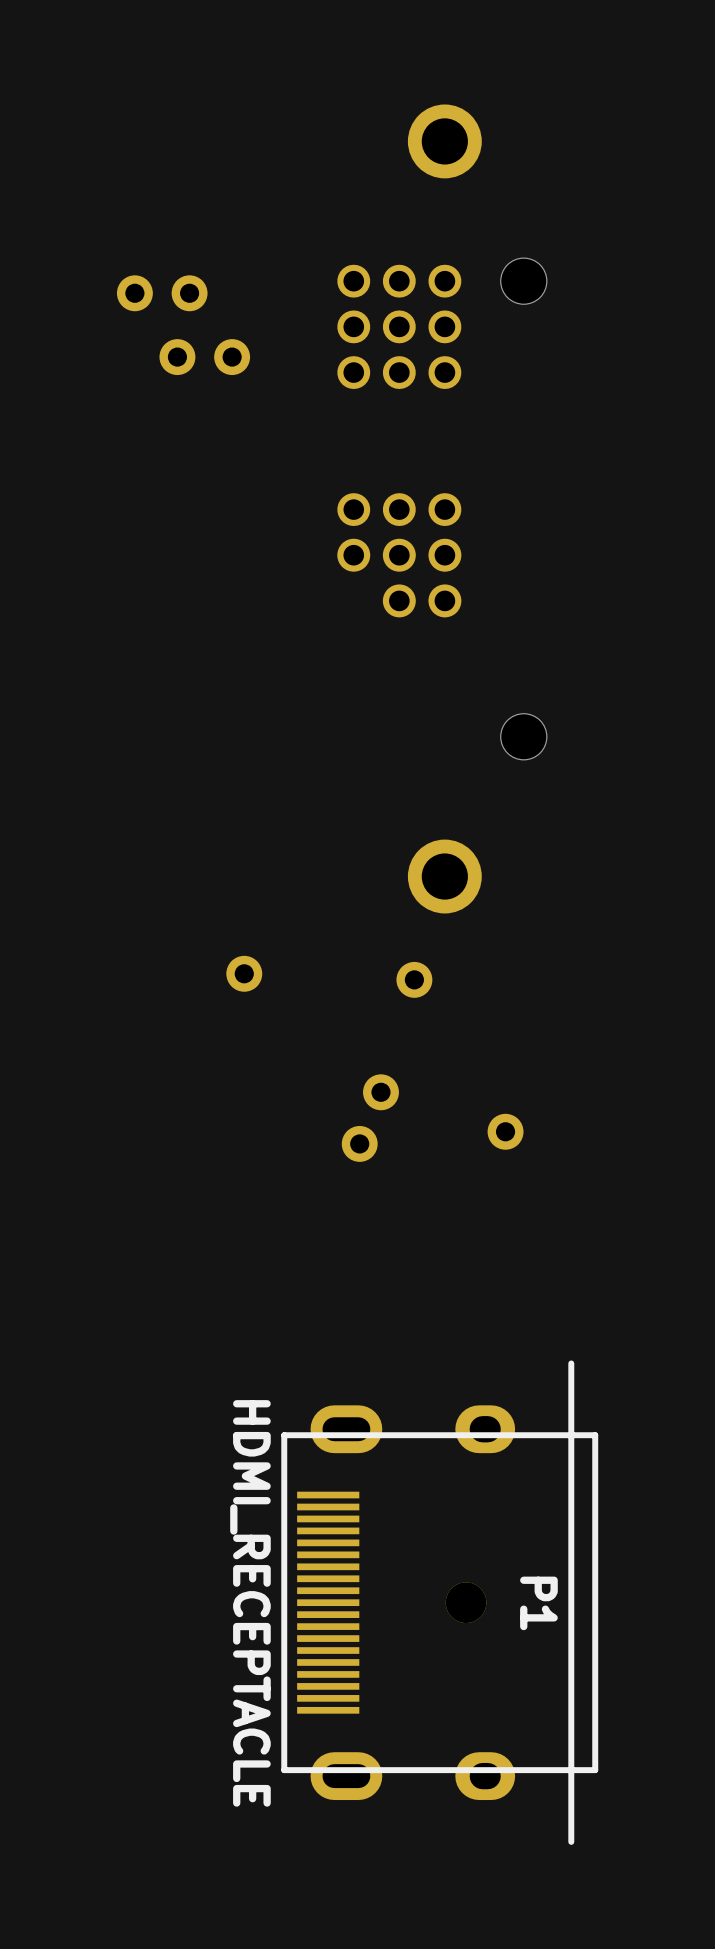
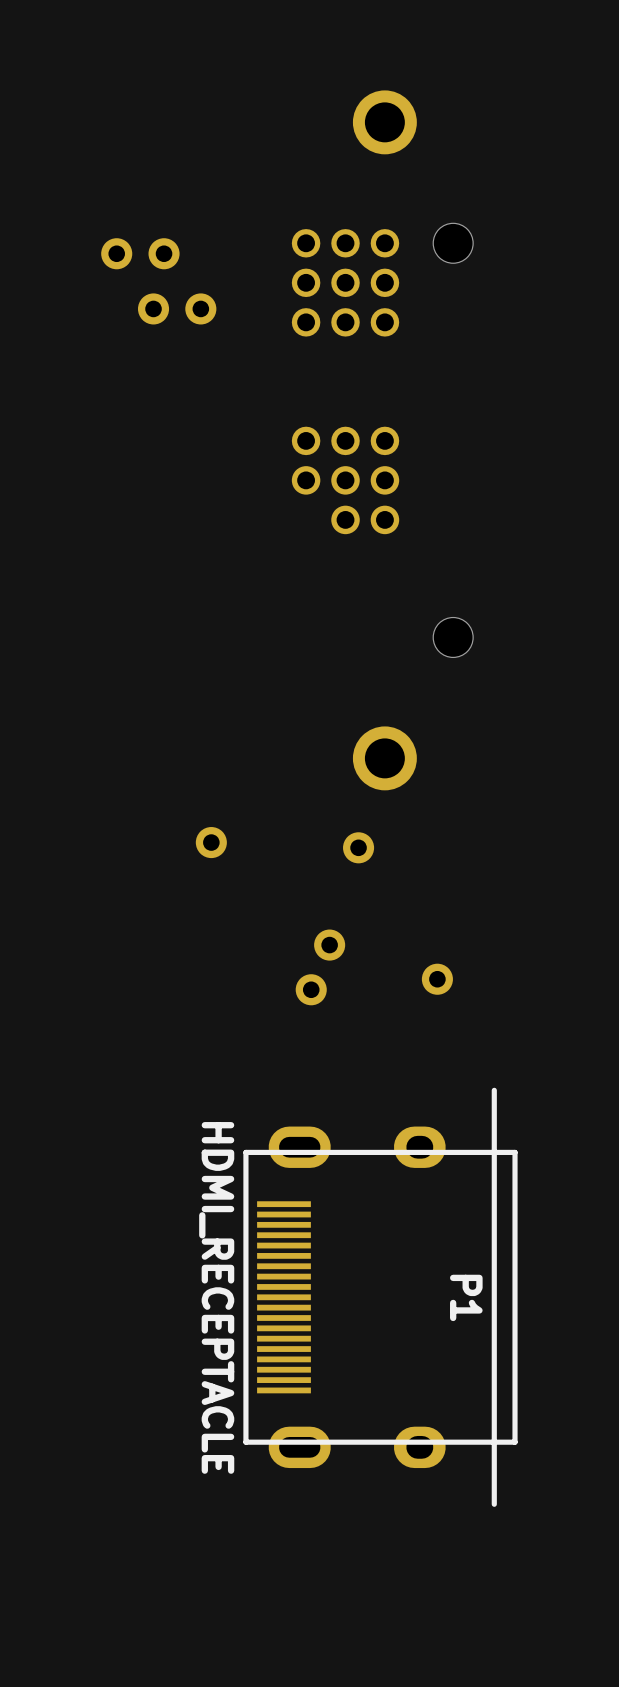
P1 footprint: [281, 1360, 599, 1845] -> [243, 1087, 518, 1507]

